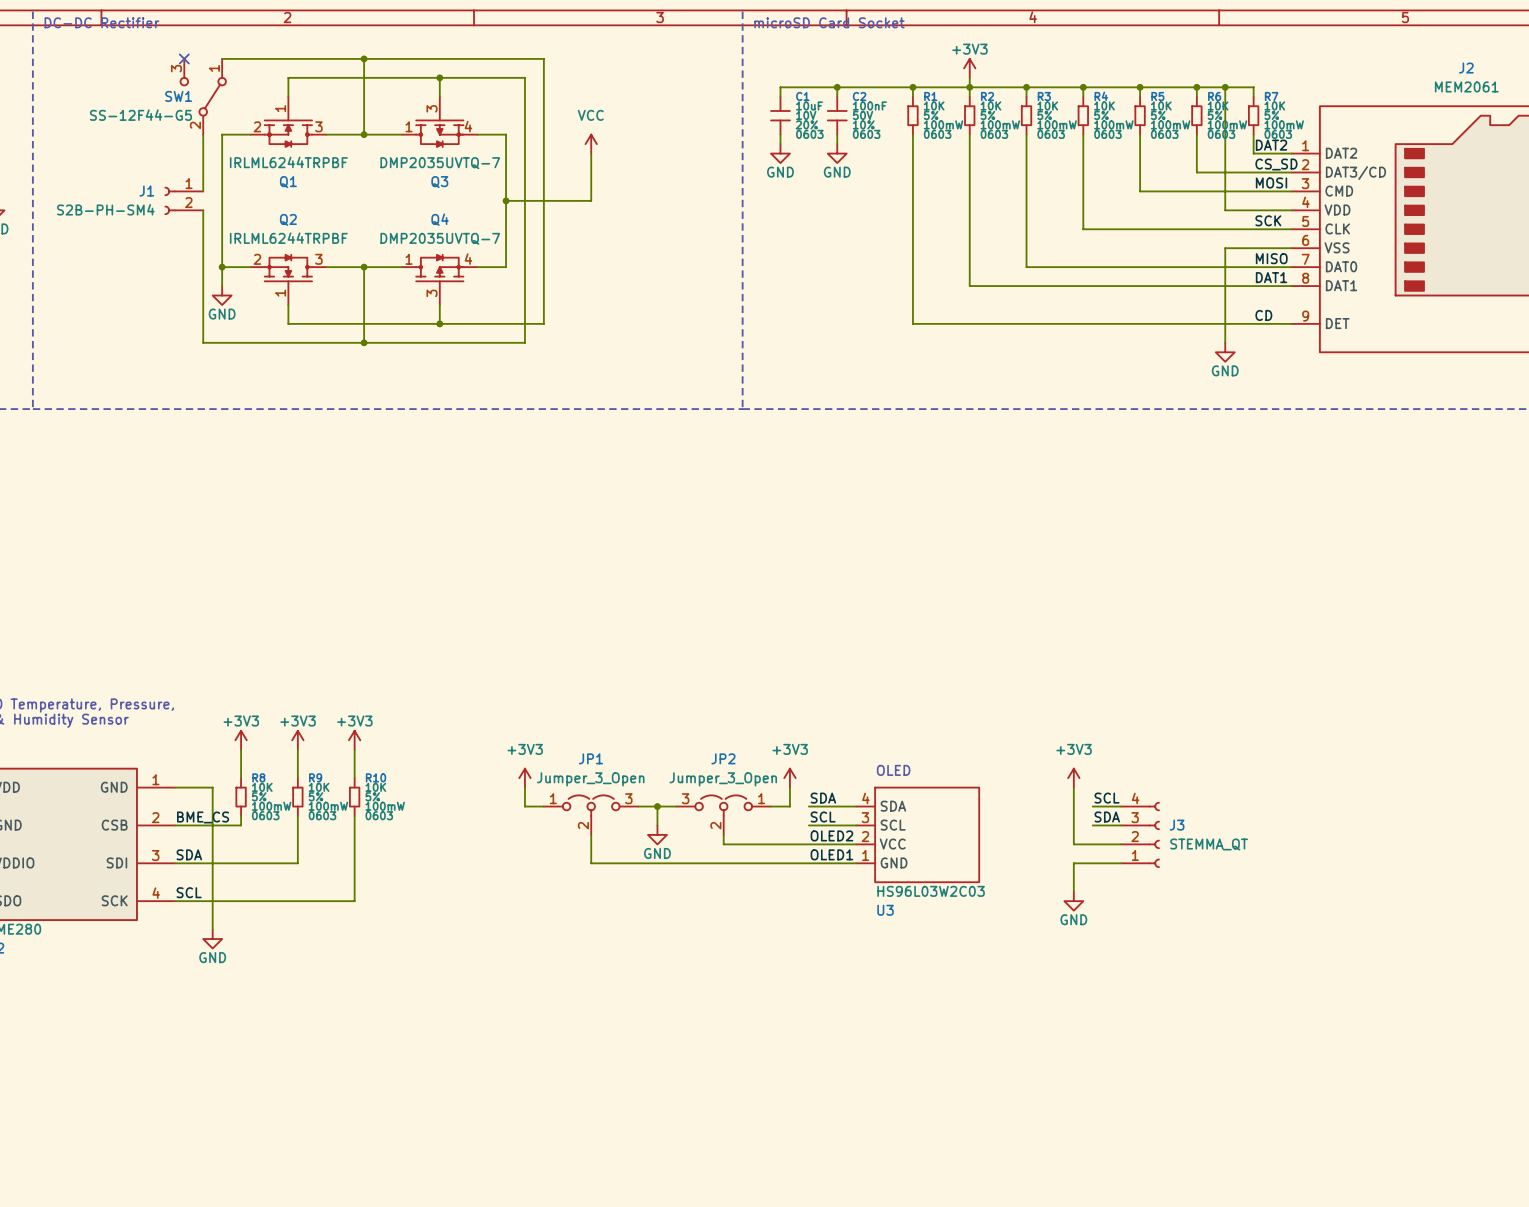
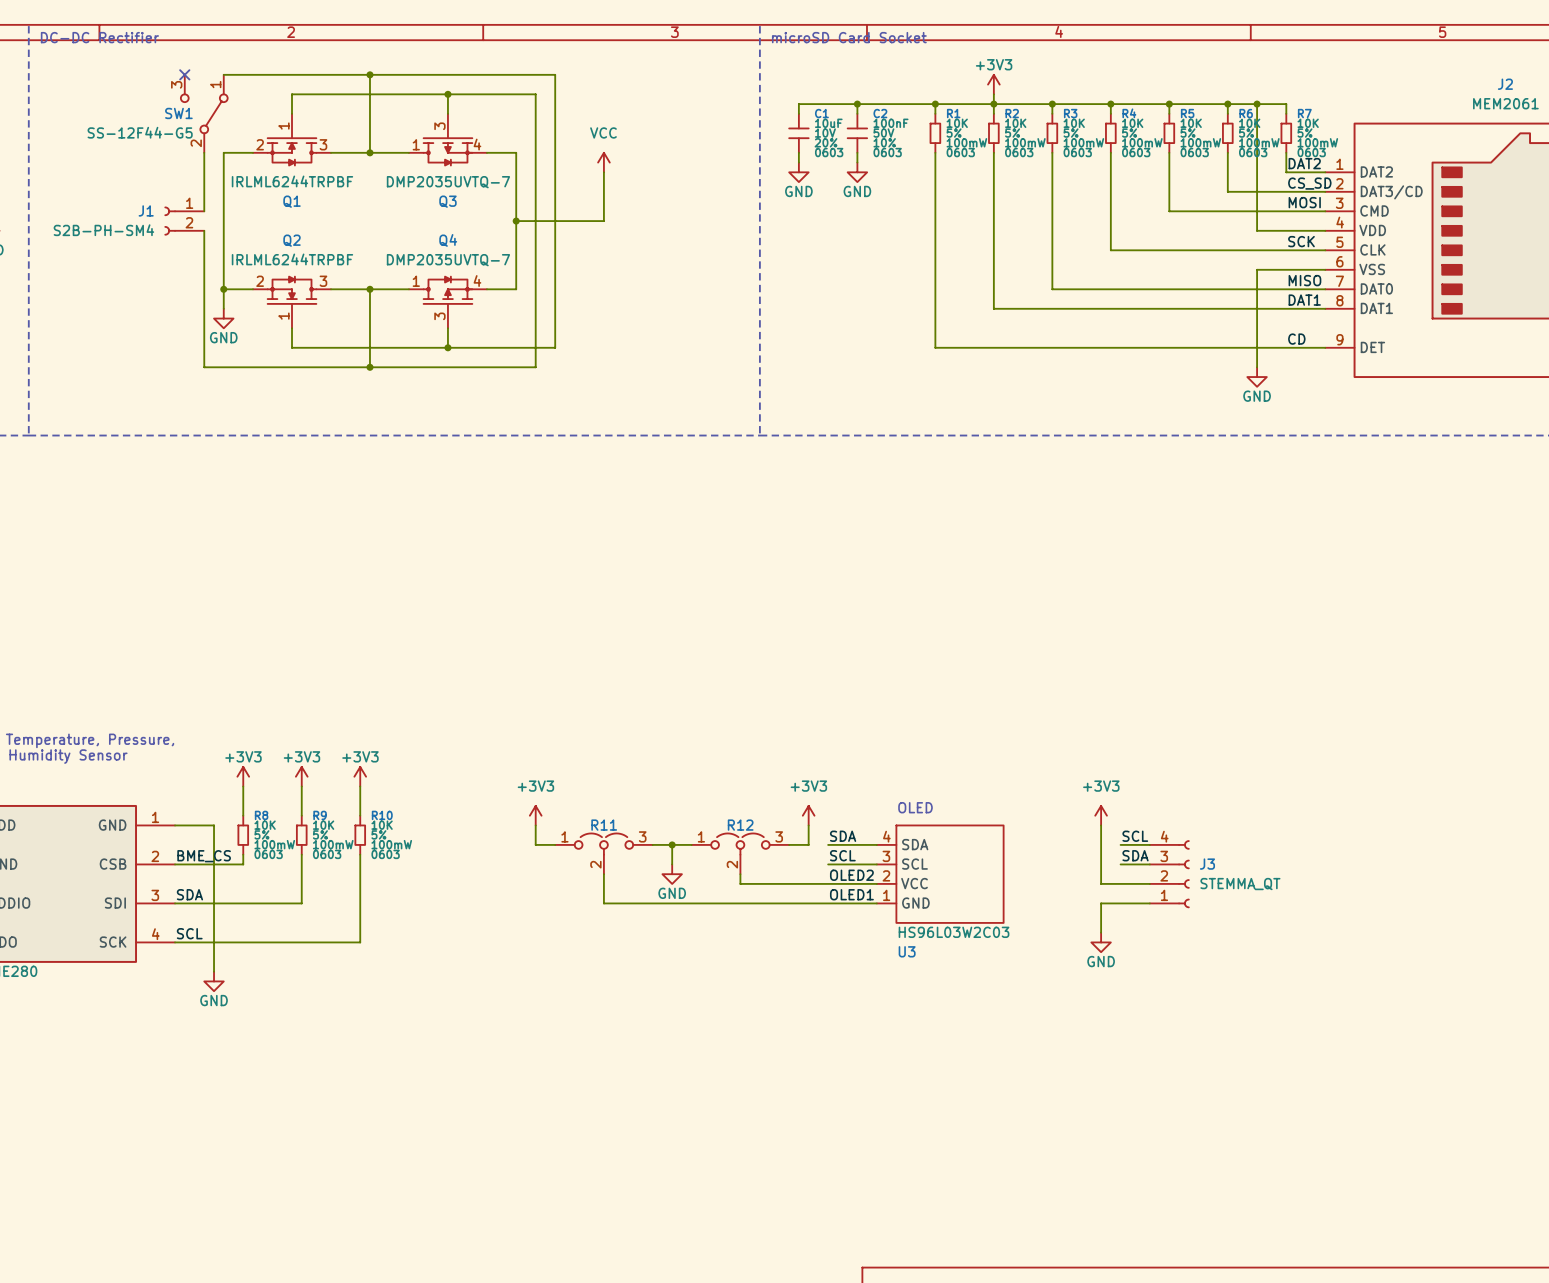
JP1 name: JP1 (590, 758) -> R11 (604, 825)
JP2 name: JP2 (723, 758) -> R12 (740, 825)
JP1 value: Jumper_3_Open (590, 779) -> none
JP2 value: Jumper_3_Open (723, 779) -> none
JP2 flip: as is (723, 805) -> left-right (740, 844)

